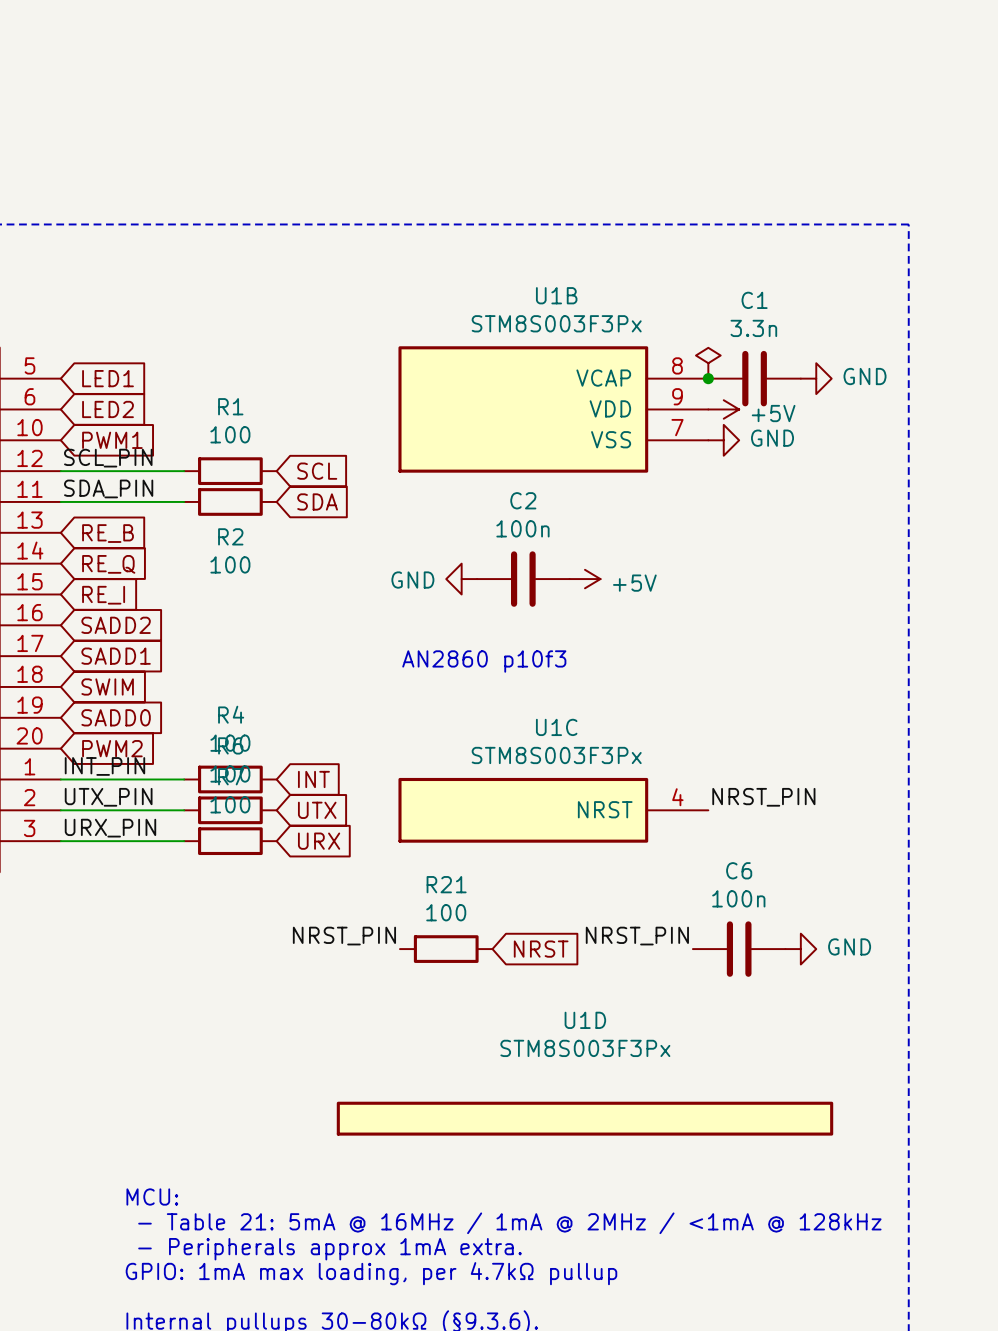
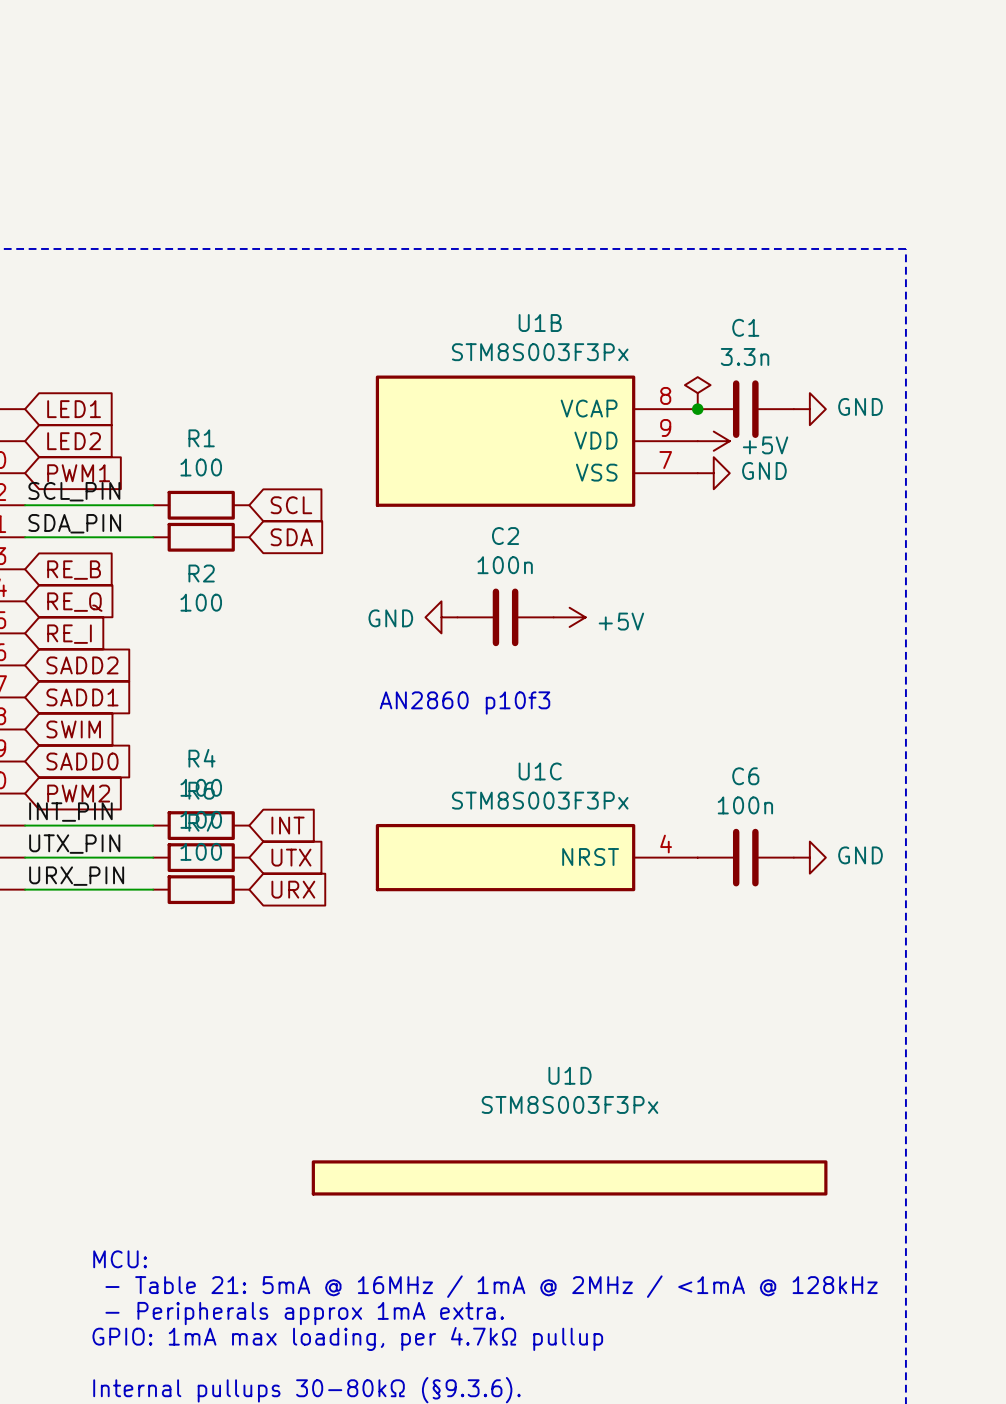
label: NRST_PIN (763, 797) -> none
label: NRST_PIN (344, 936) -> none
label: NRST_PIN (637, 936) -> none
R21: 100 (446, 949) -> none
global label: NRST (541, 949) -> none
C6 position: (739, 949) -> (745, 857)
power symbol position: GND (800, 949) -> GND (809, 857)

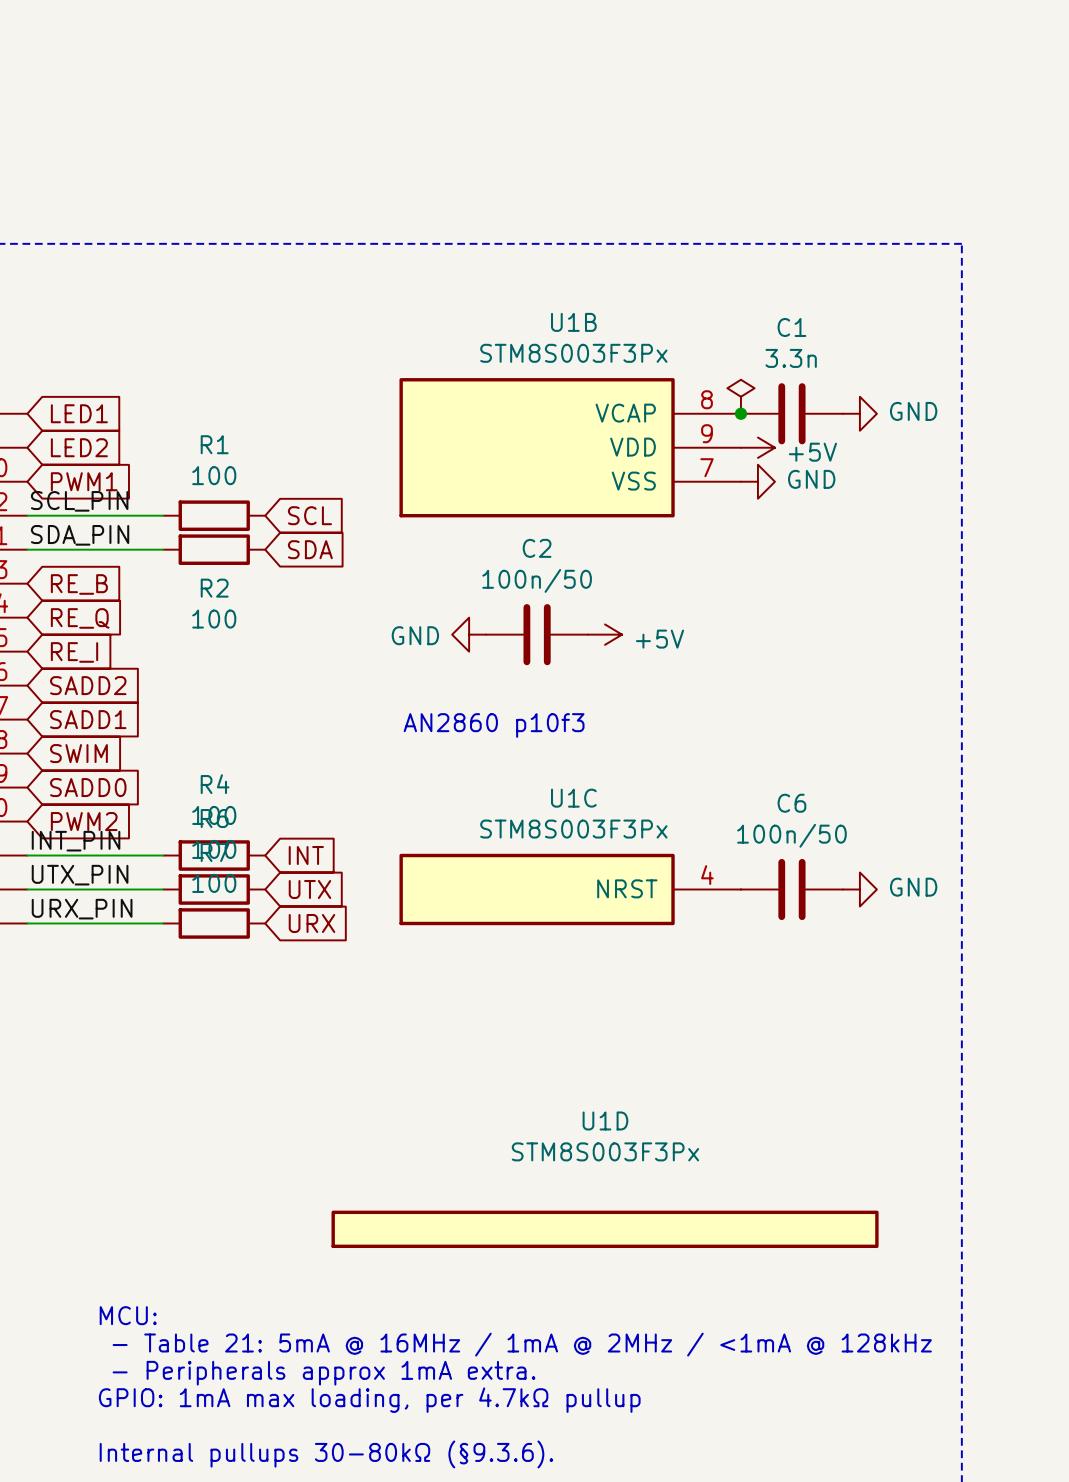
C2 value: 100n (505, 565) -> 100n/50 (537, 580)
C6 value: 100n (745, 805) -> 100n/50 (791, 835)

